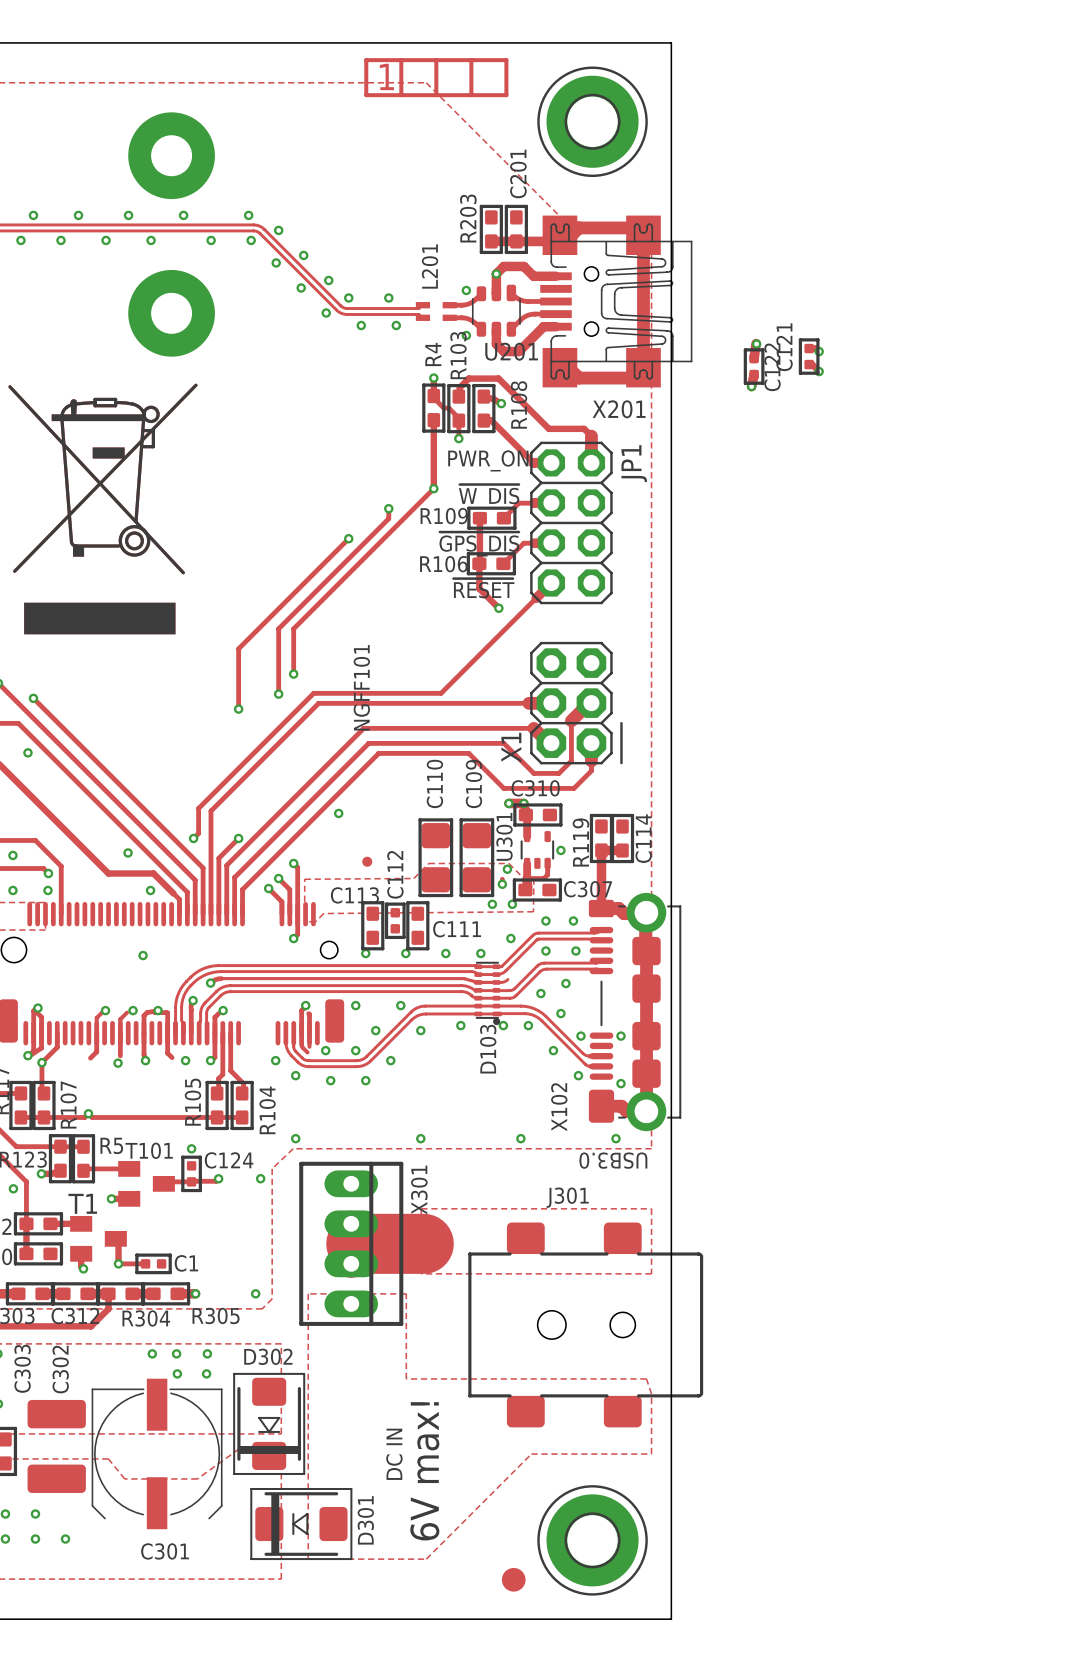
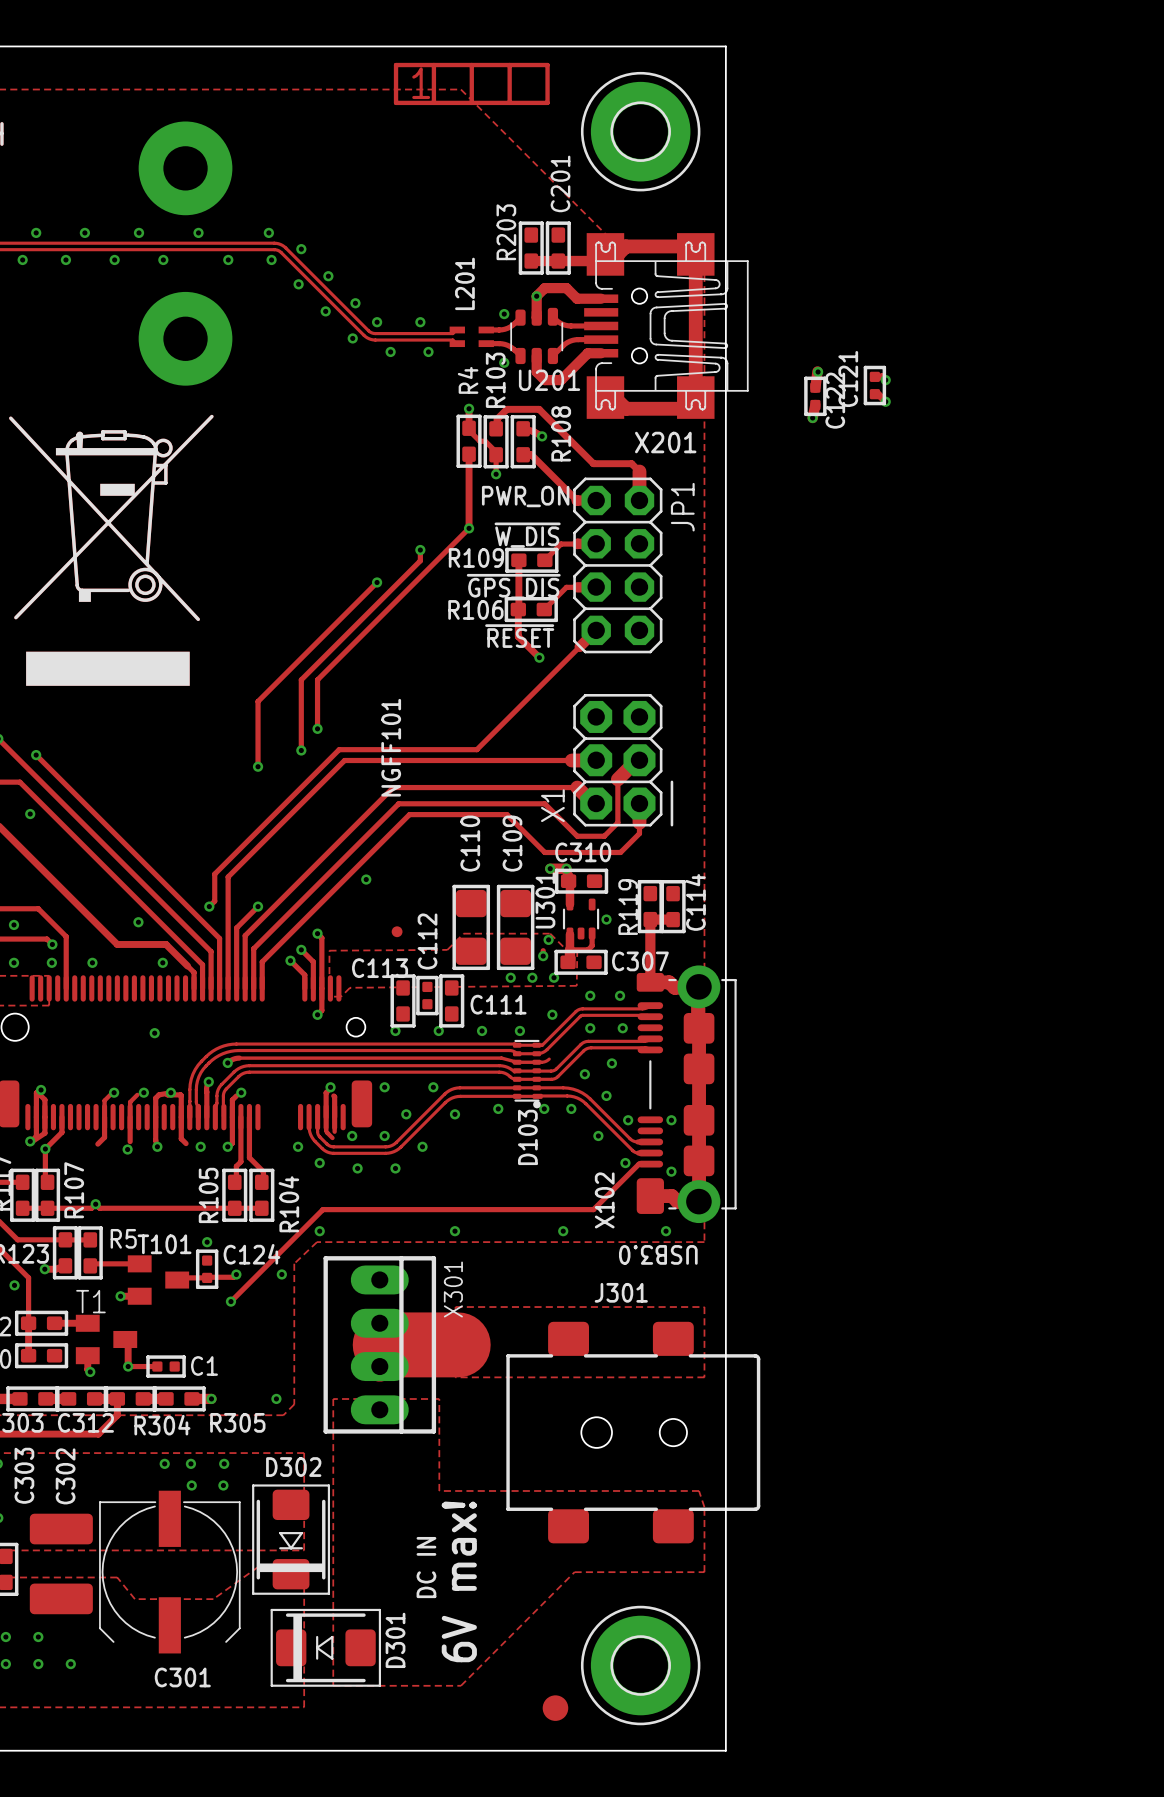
via: none -> (92, 962)
via: none -> (510, 977)
track: none -> (650, 1164) (639, 1164) (593, 1209) (322, 1209) (230, 1301)
via: none -> (230, 1301)

